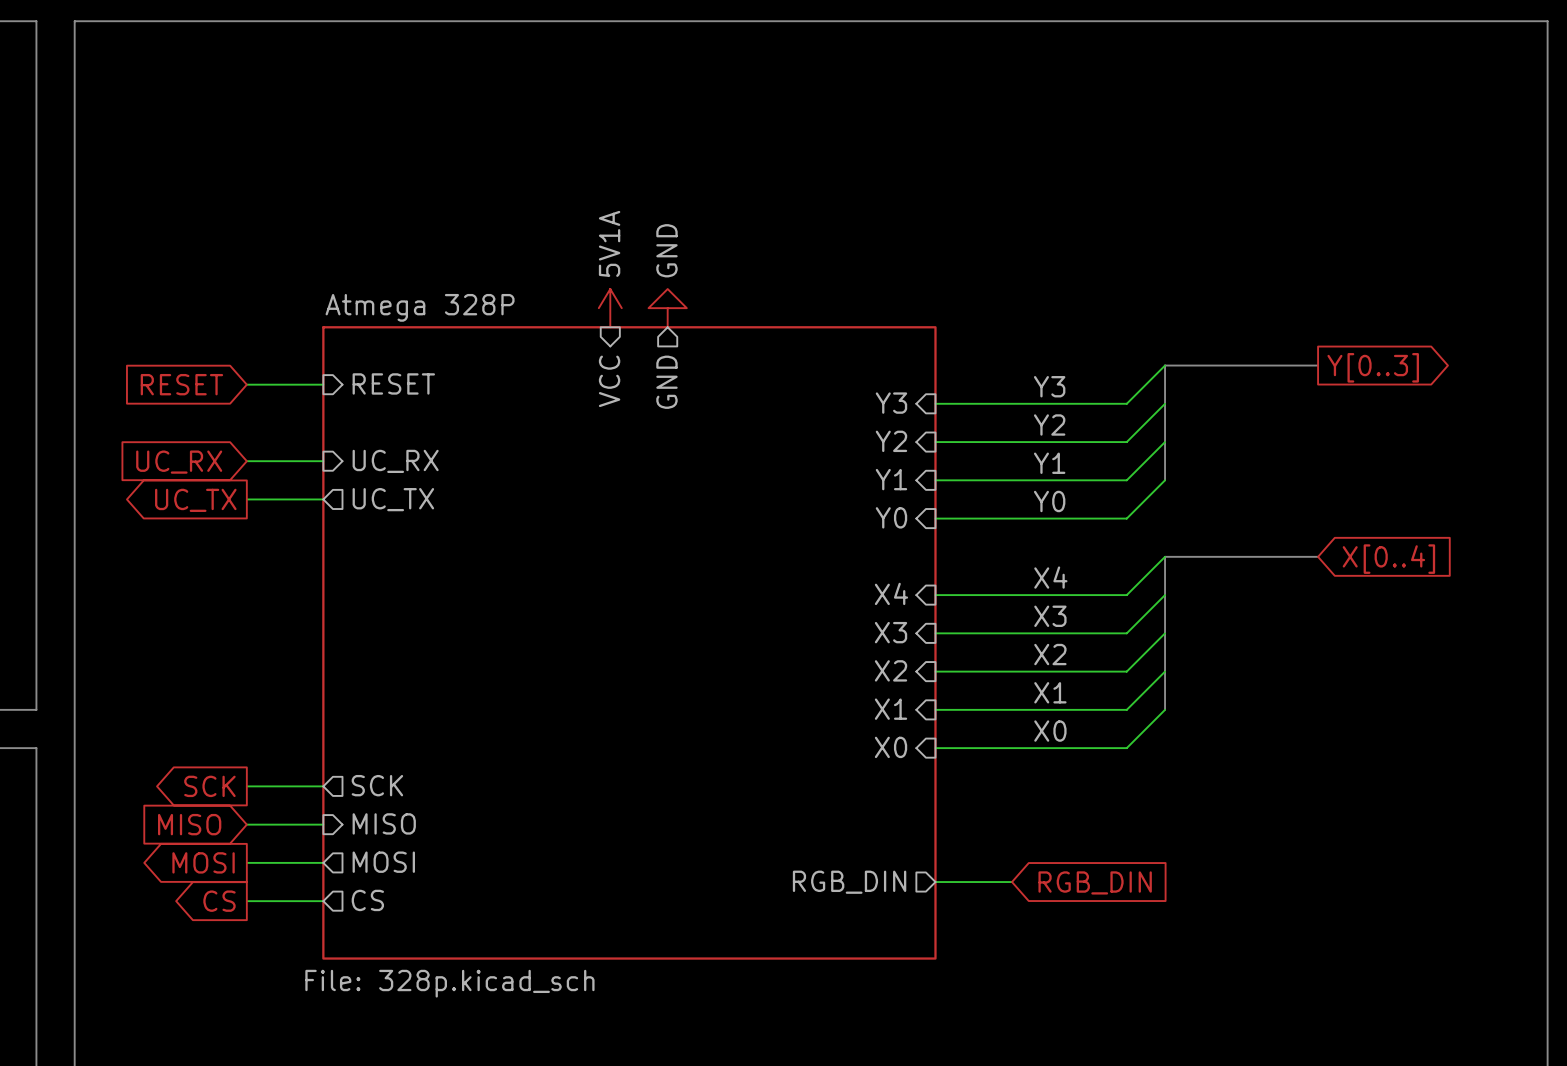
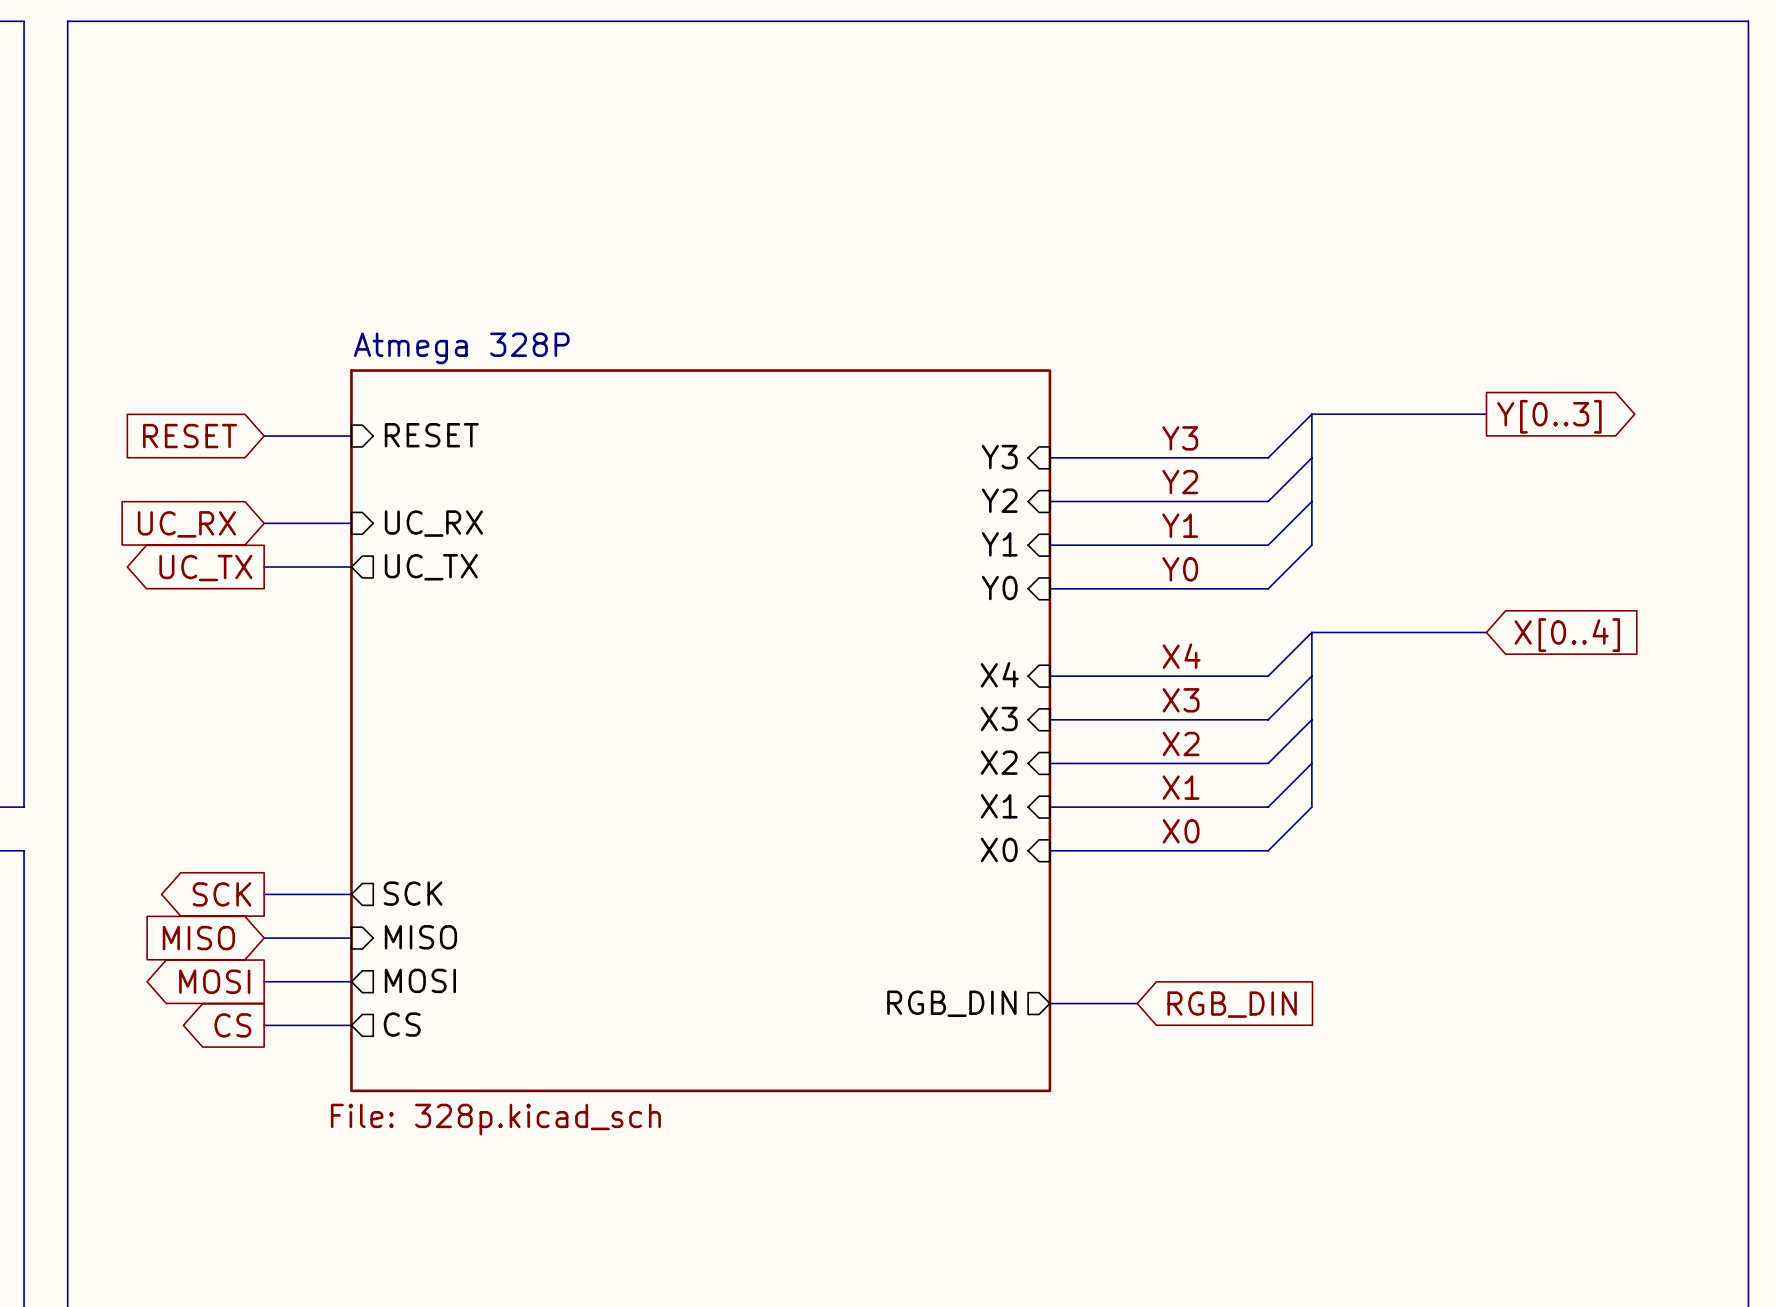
power symbol: 5V1A (610, 308) -> none
power symbol: GND (667, 308) -> none
sheet pin: VCC (609, 381) -> none
sheet pin: GND (666, 382) -> none

